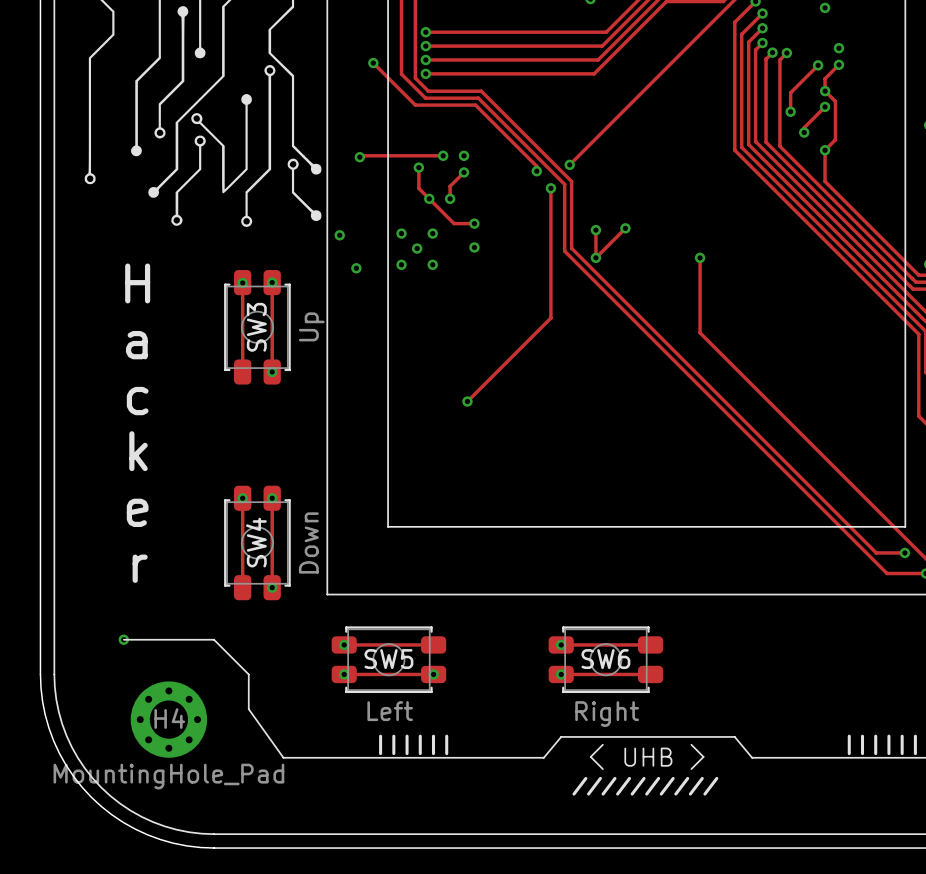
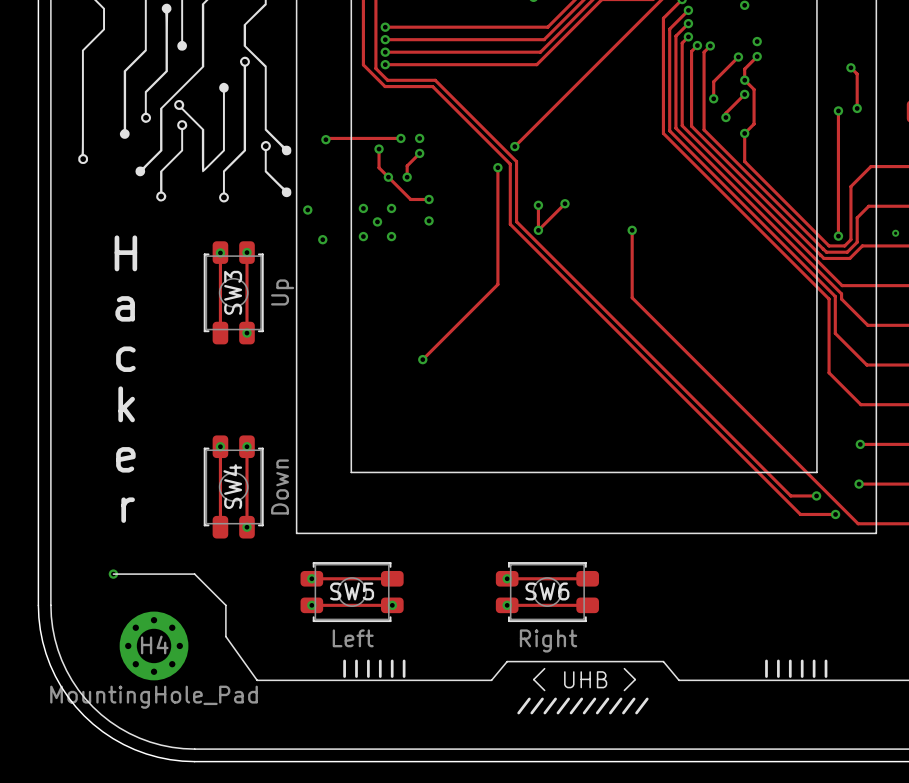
track: (373, 63) (415, 105) (475, 105) (536, 166) (536, 171) -> none
via: (373, 63) -> none
via: (536, 171) -> none

